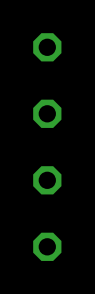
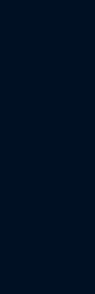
part: (47, 47) -> none
part: (47, 113) -> none
part: (47, 180) -> none
part: (47, 246) -> none

